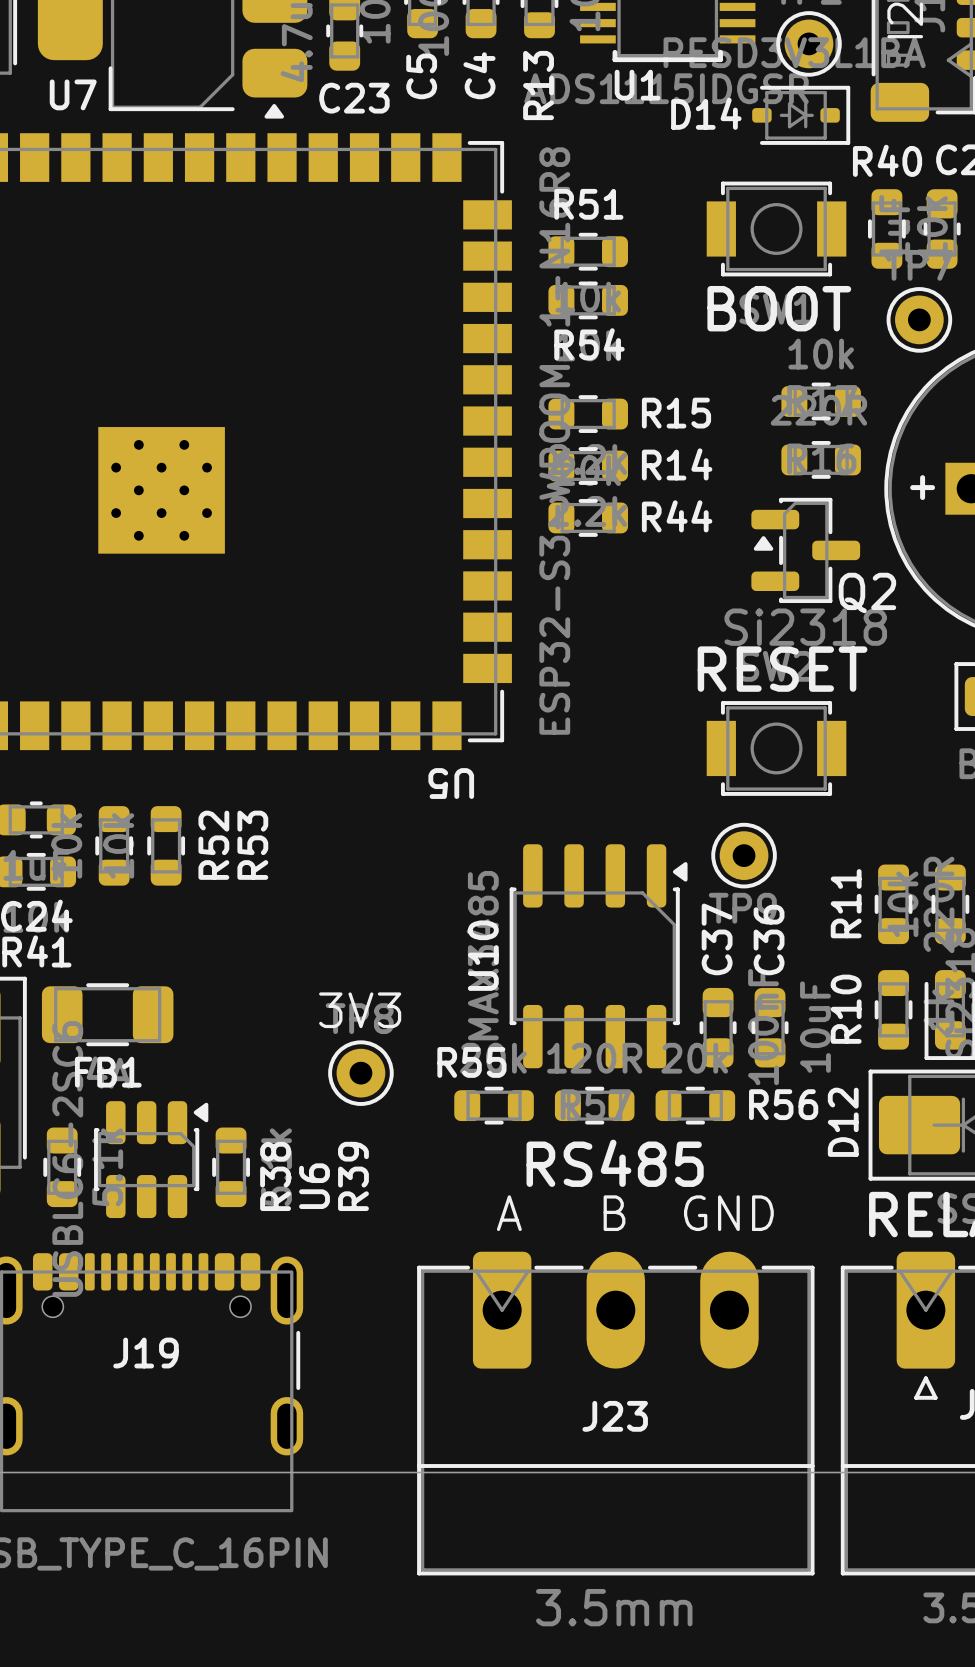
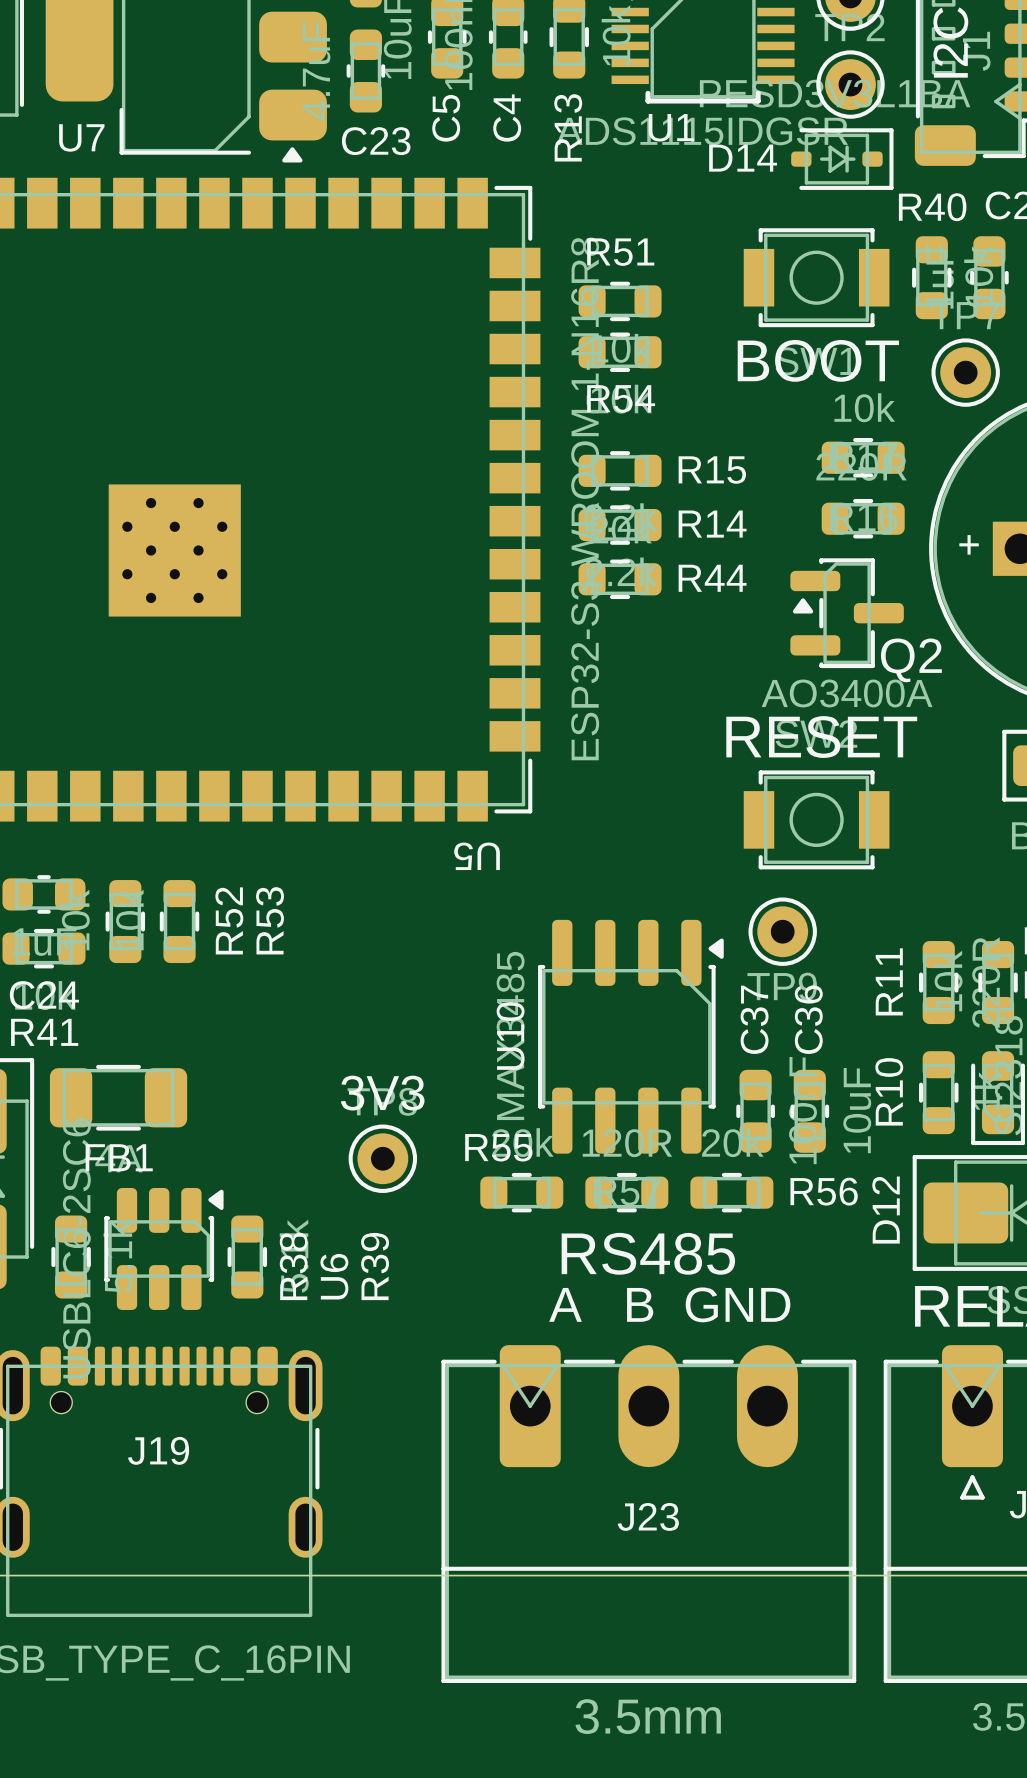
Q2 value: Si2318 (805, 627) -> AO3400A (847, 693)

